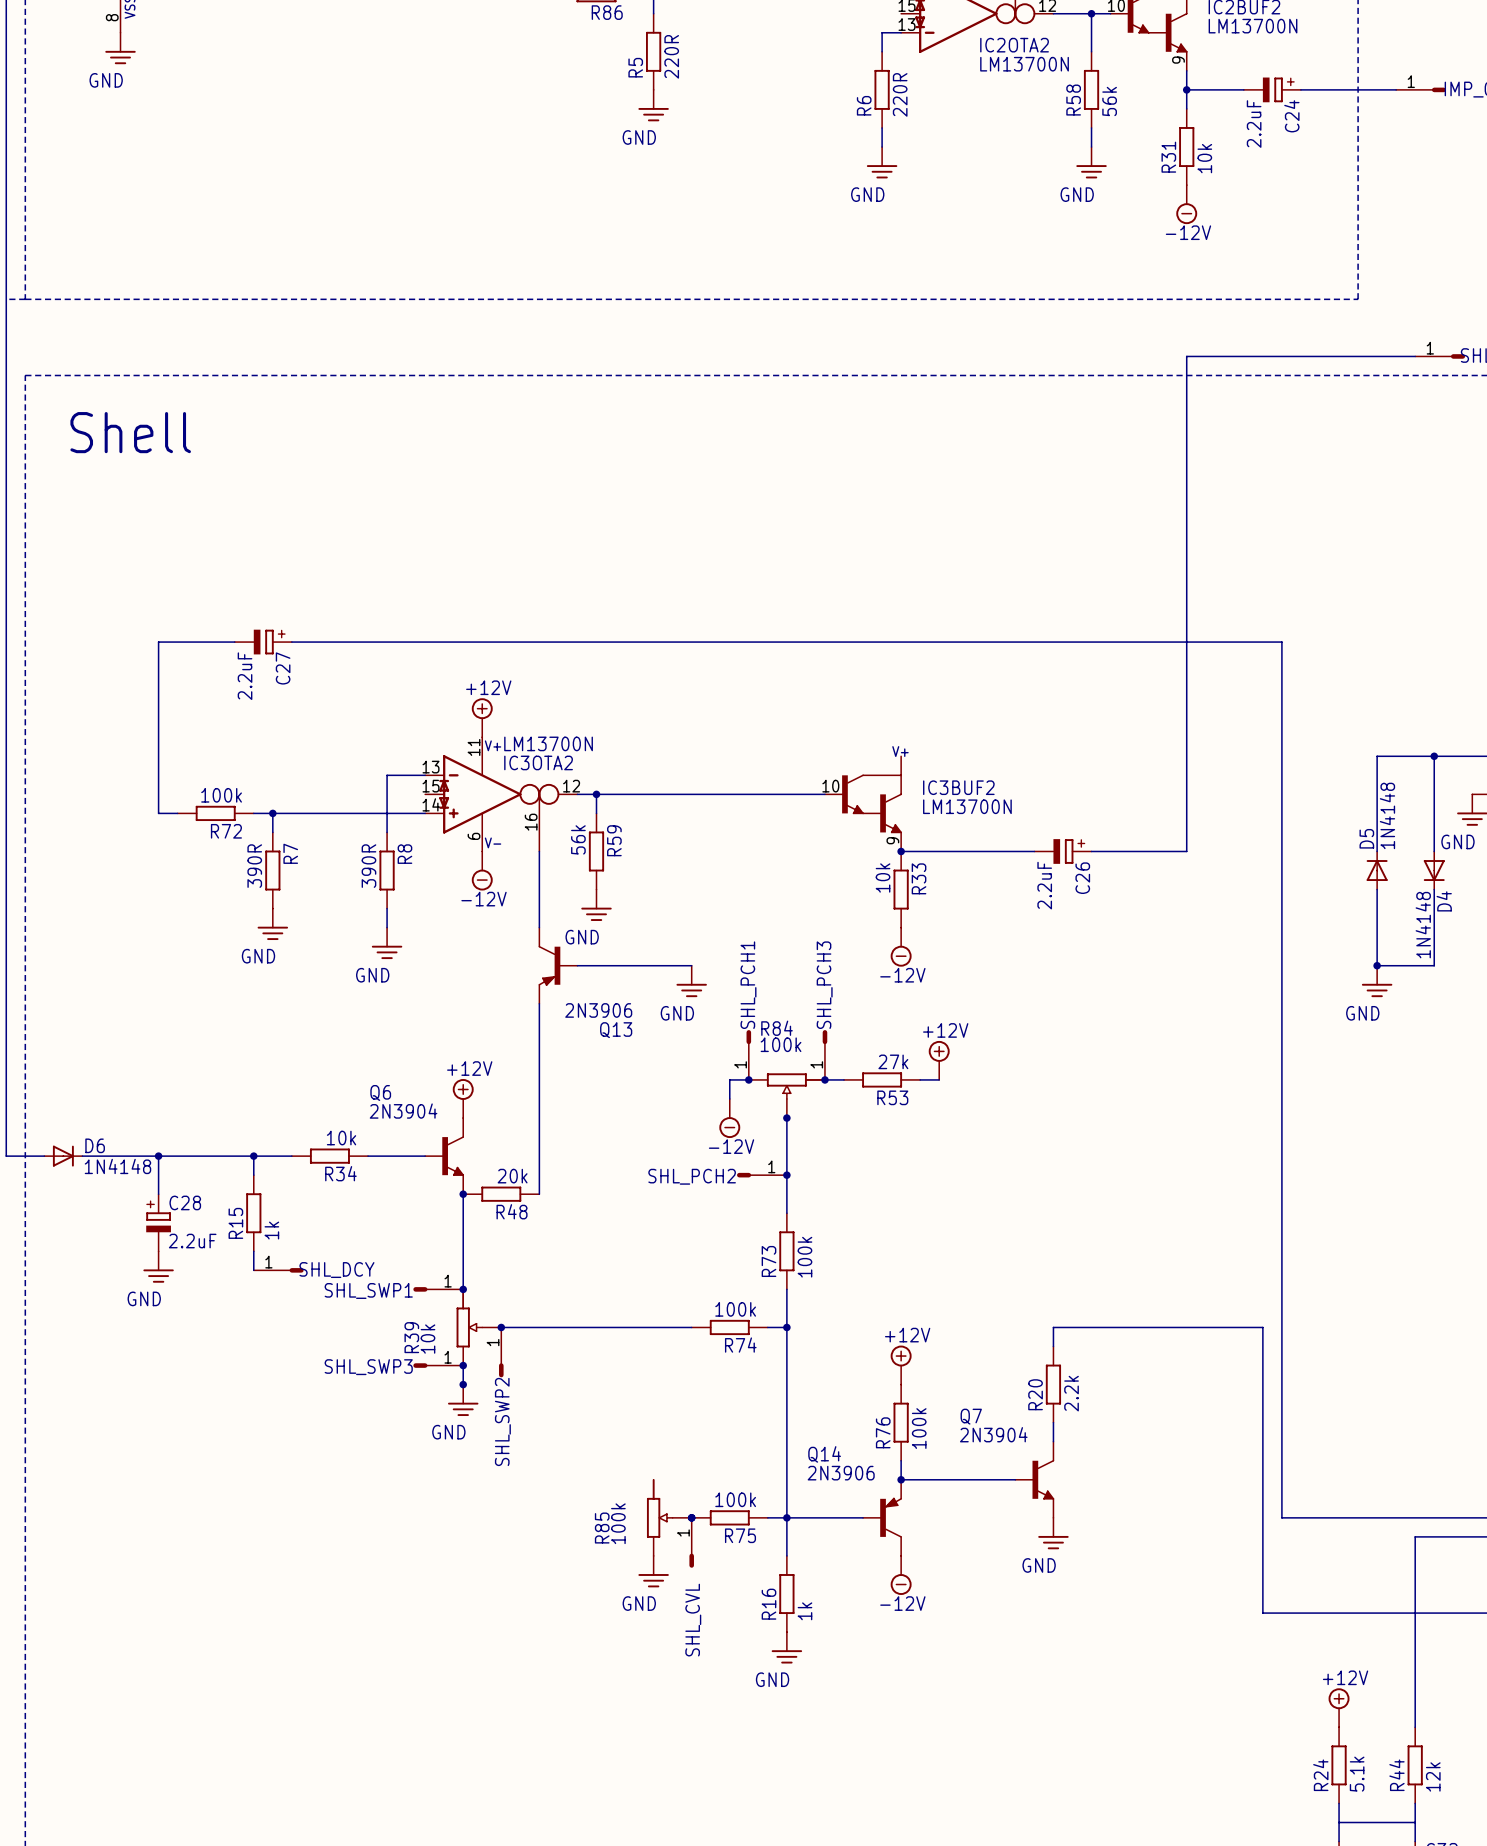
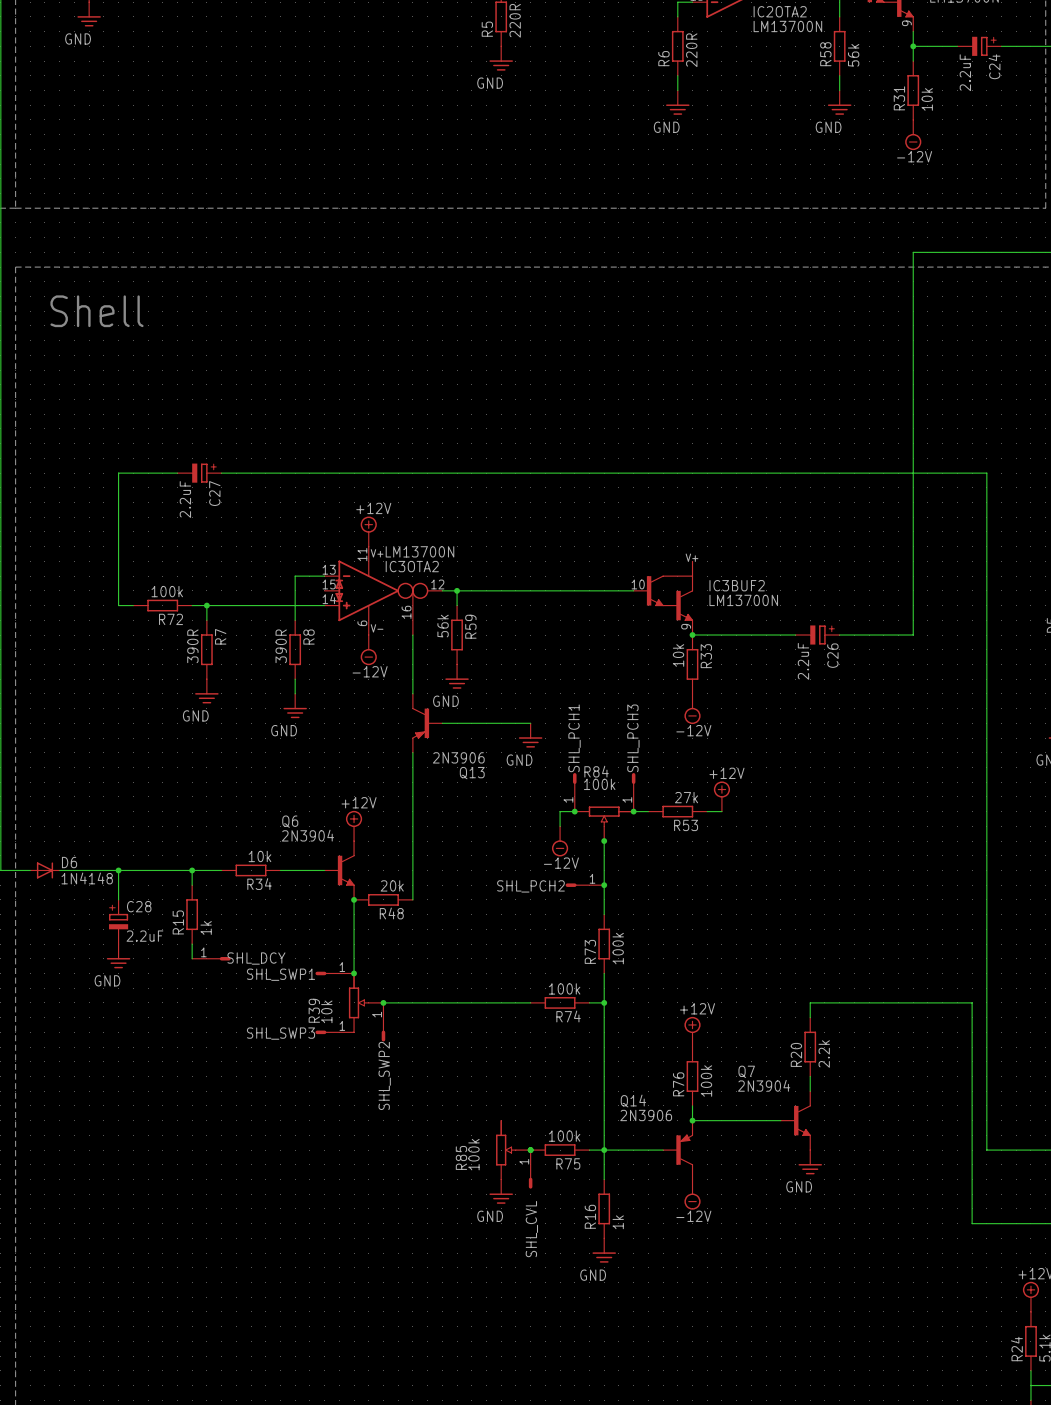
wire: (463, 1365) (463, 1384) -> none
junction: (463, 1365) -> none
junction: (463, 1384) -> none
power symbol: GND (463, 1400) -> none

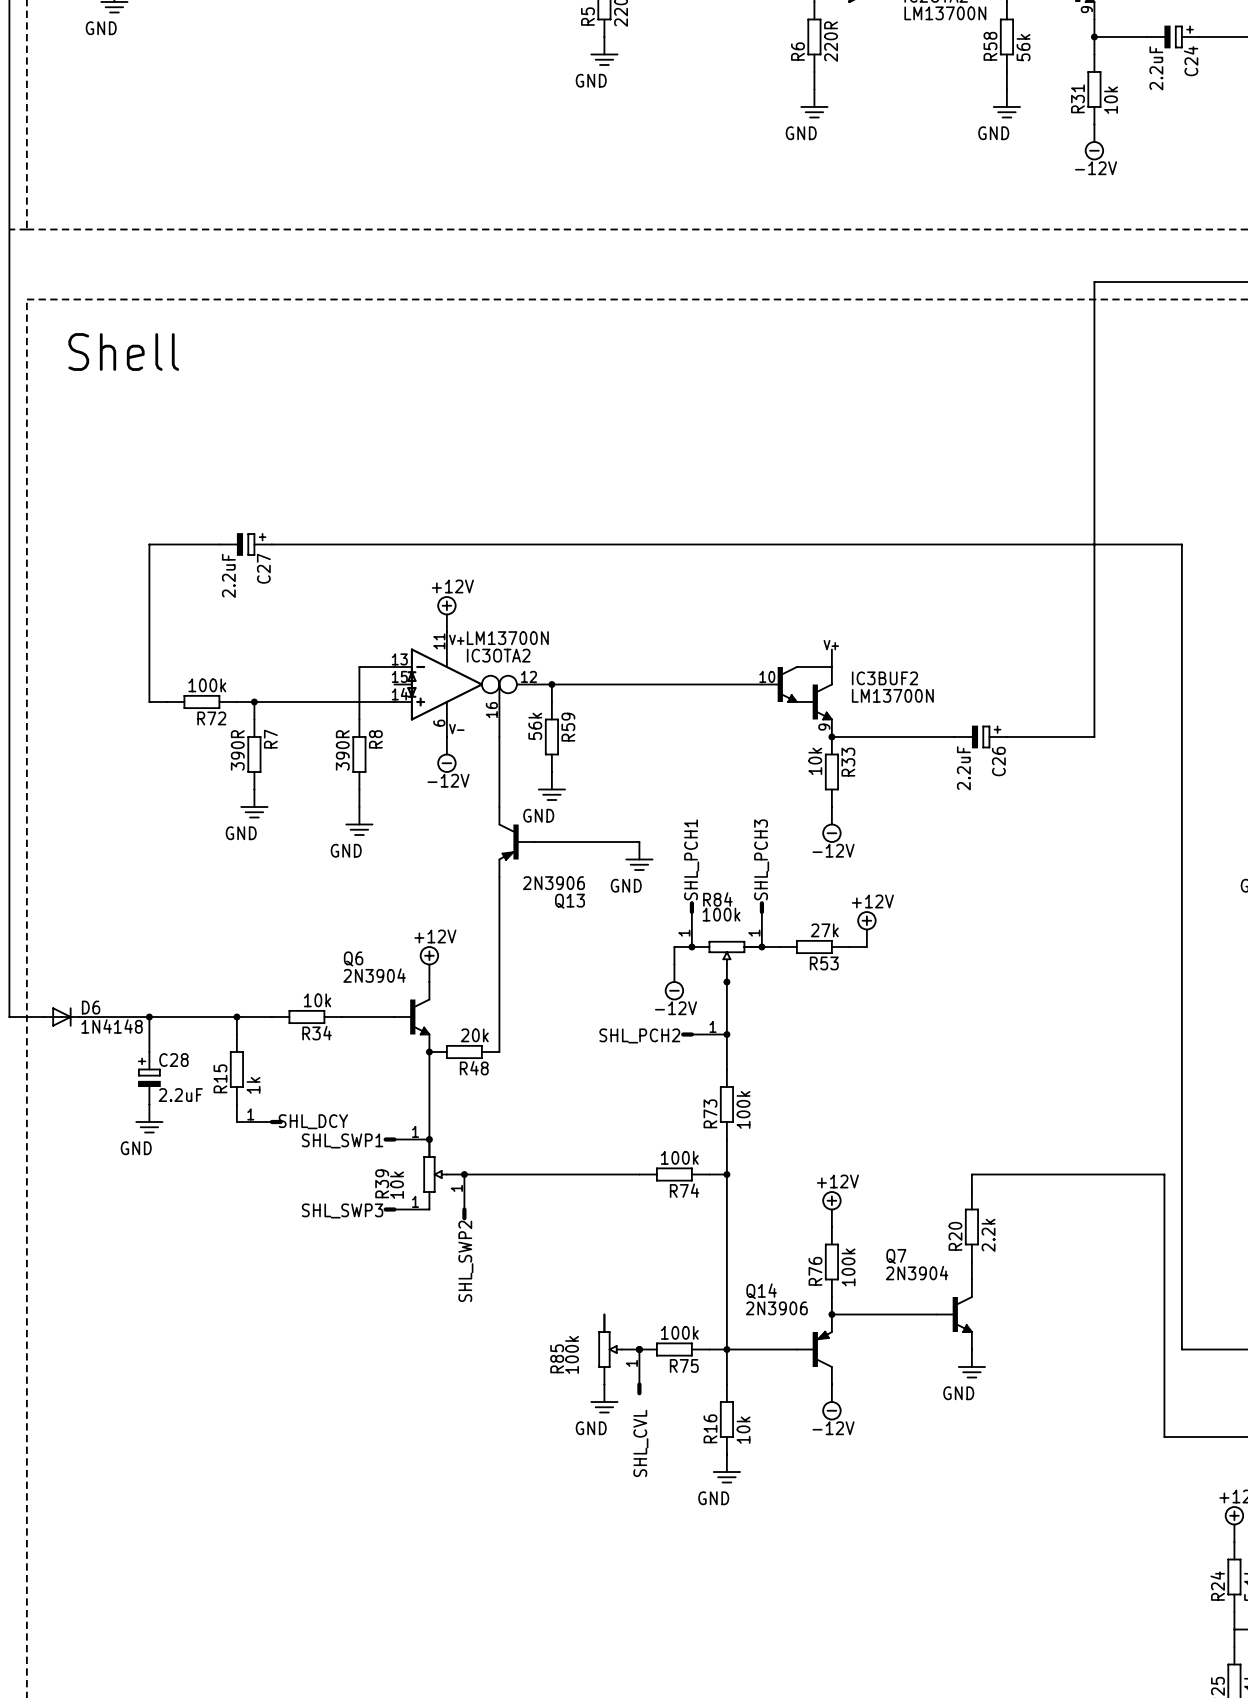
R16 value: 1k (618, 1222) -> 10k (743, 1430)

